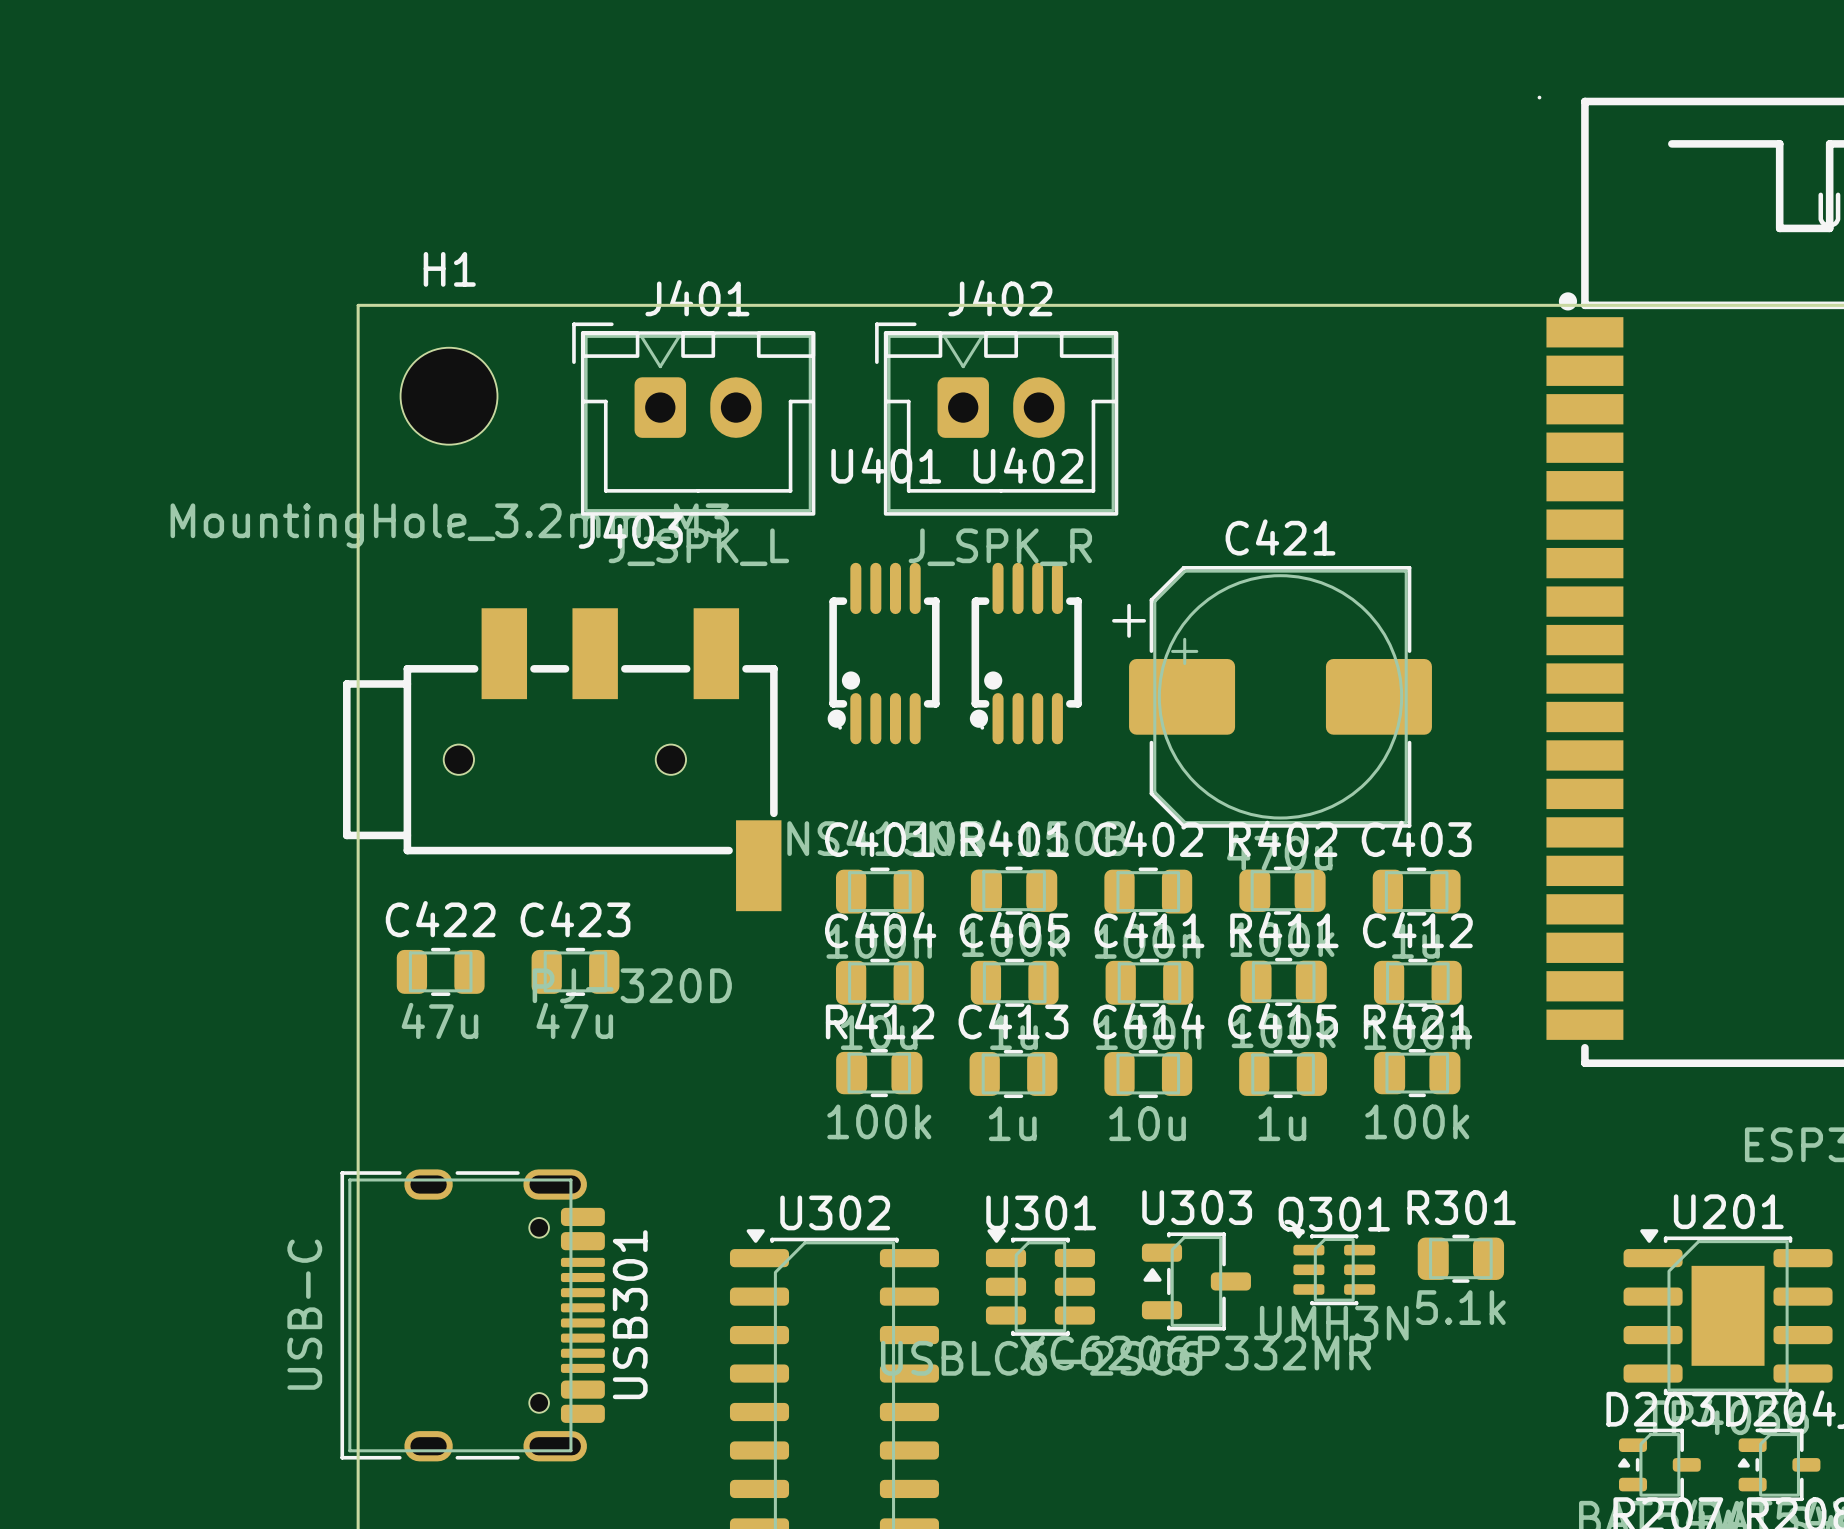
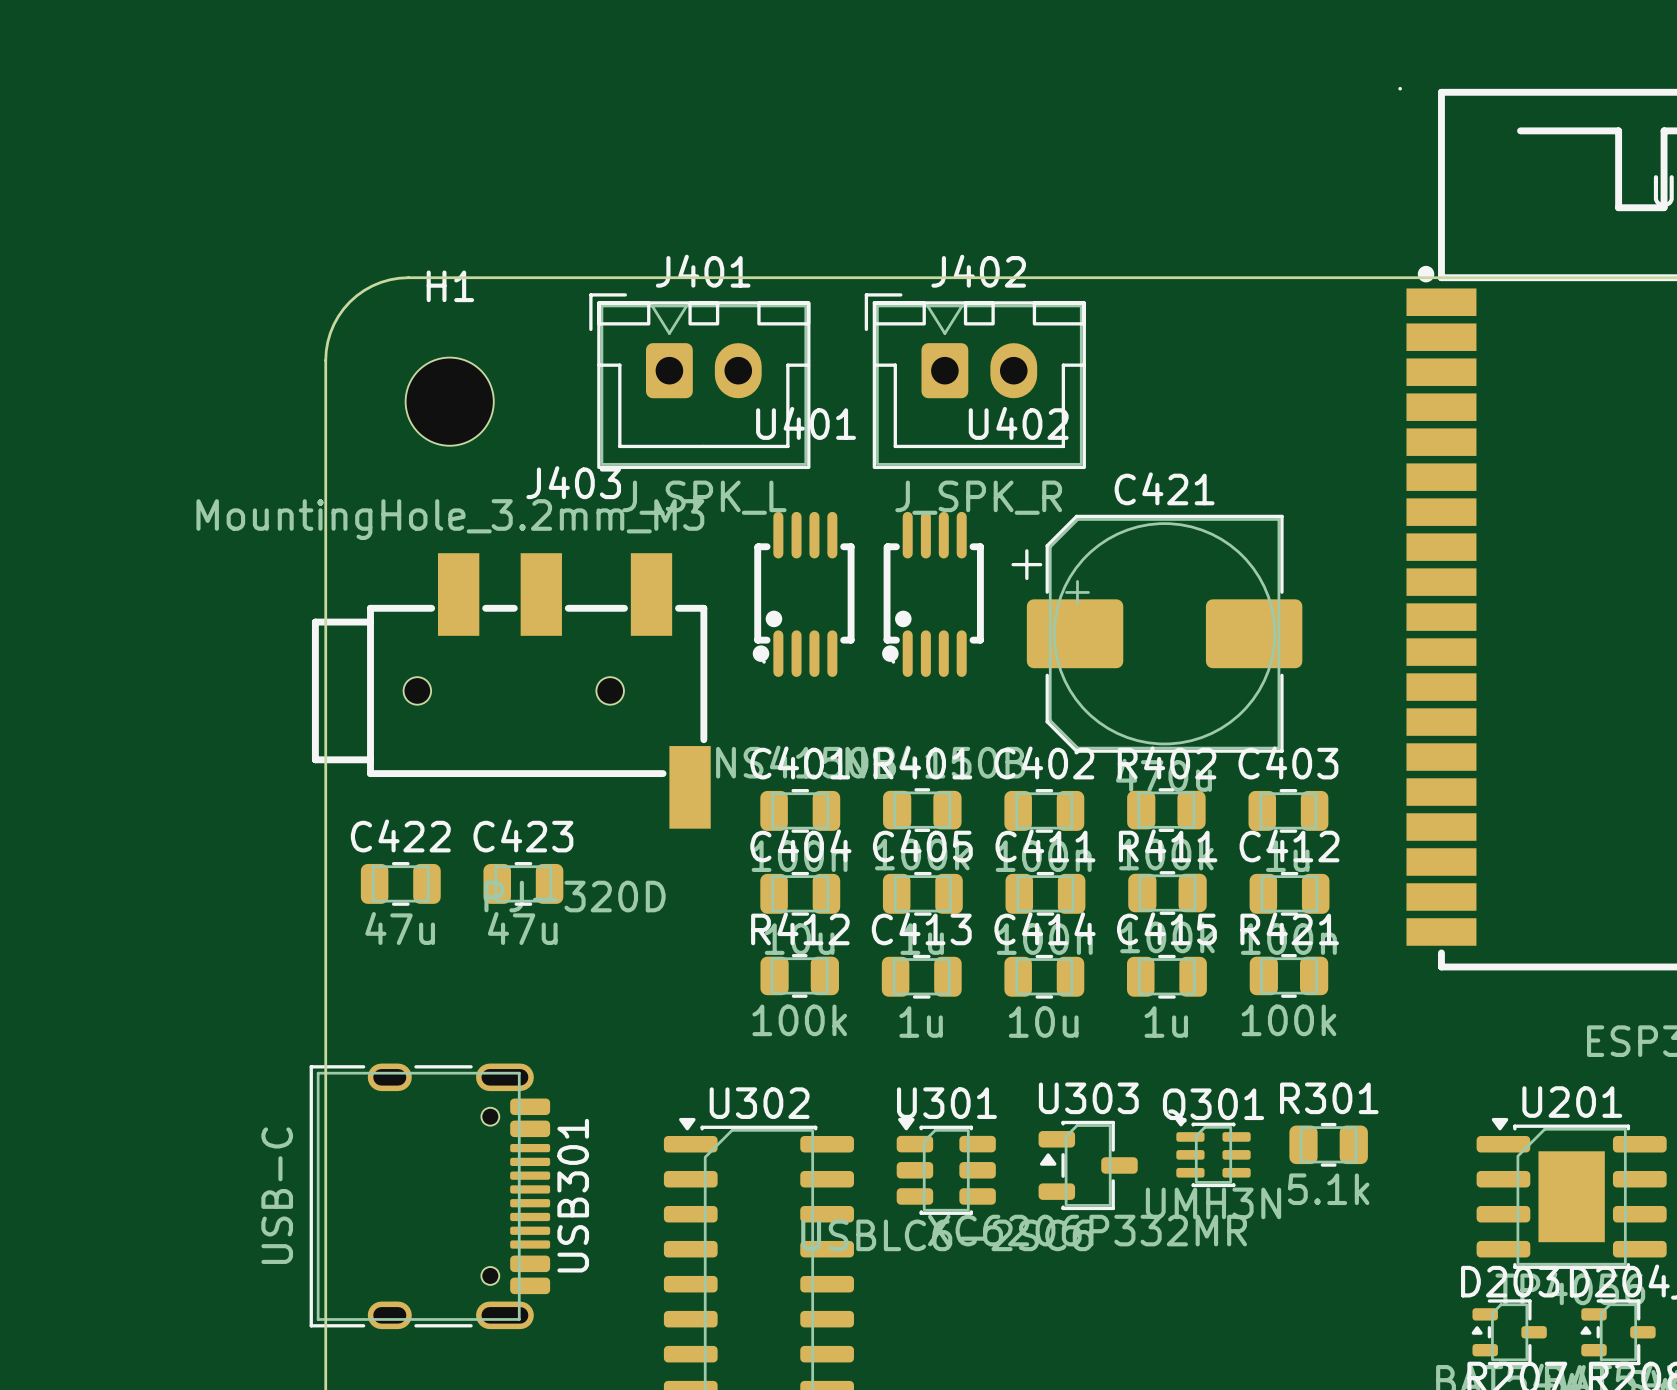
board edge: (449, 305) (358, 305) (358, 396) -> (408, 277) (381, 282) (364, 290) (349, 301) (338, 316) (330, 333) (325, 360)
H1 position: (449, 396) -> (449, 401)
J401 position: (693, 419) -> (699, 381)
J402 position: (996, 419) -> (975, 381)
U402 name position: U402 (1028, 465) -> U402 (1018, 423)

